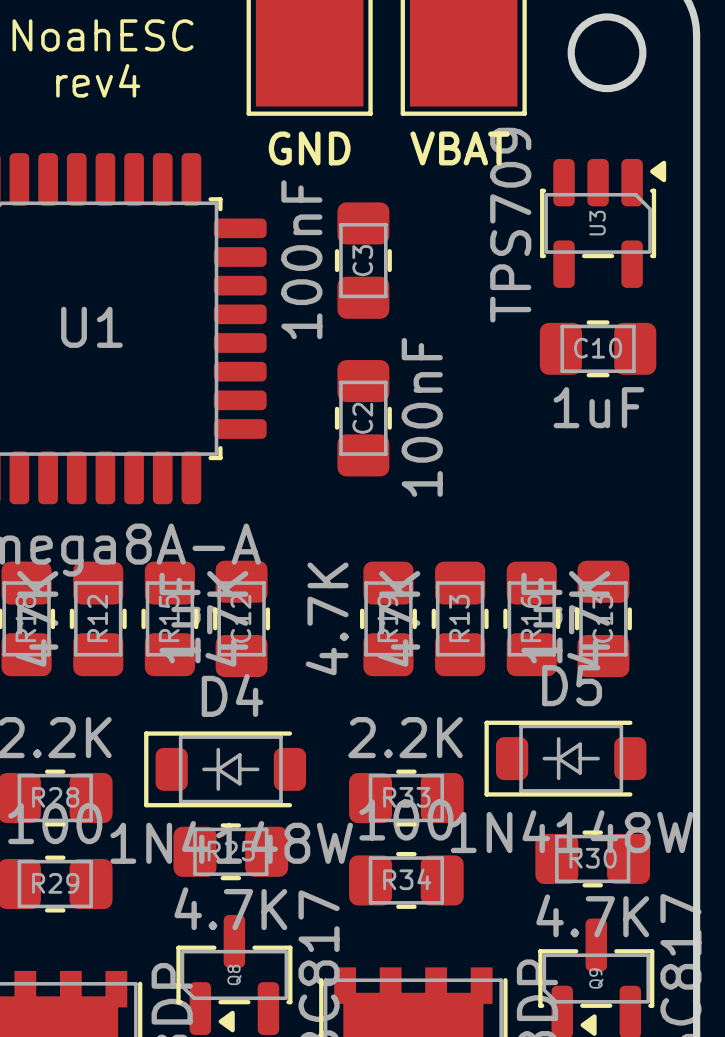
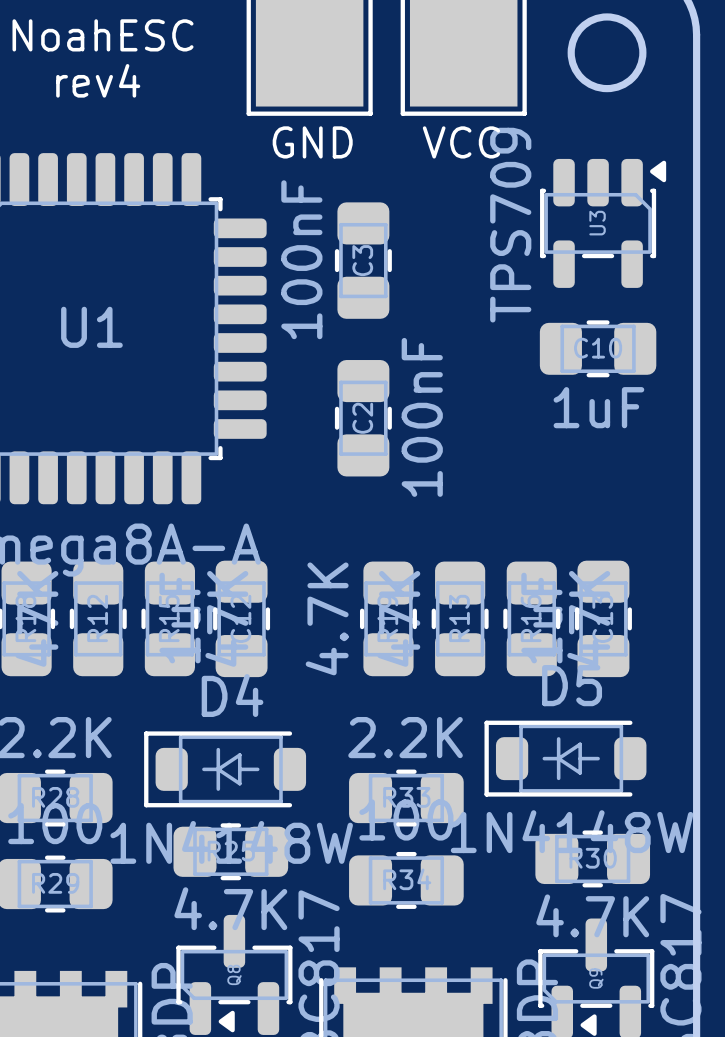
text: none -> GND VCC (386, 142)
part value: GND (309, 148) -> none
part value: VBAT (460, 148) -> none

